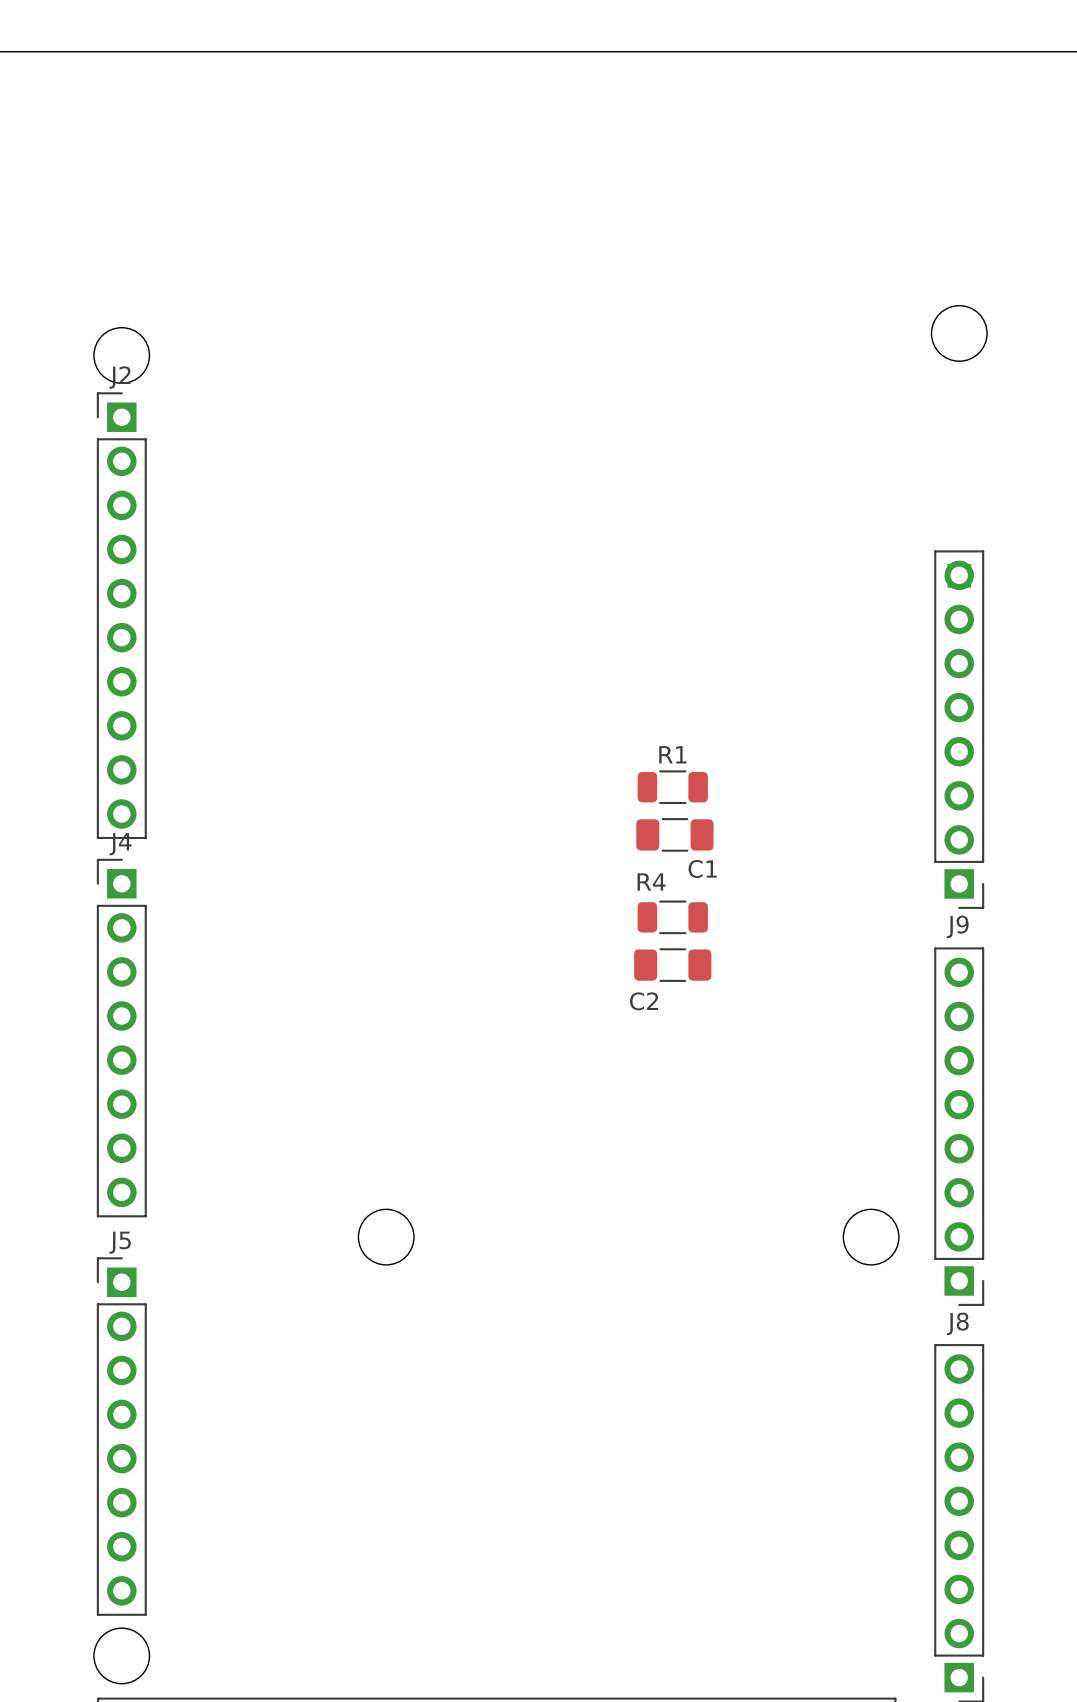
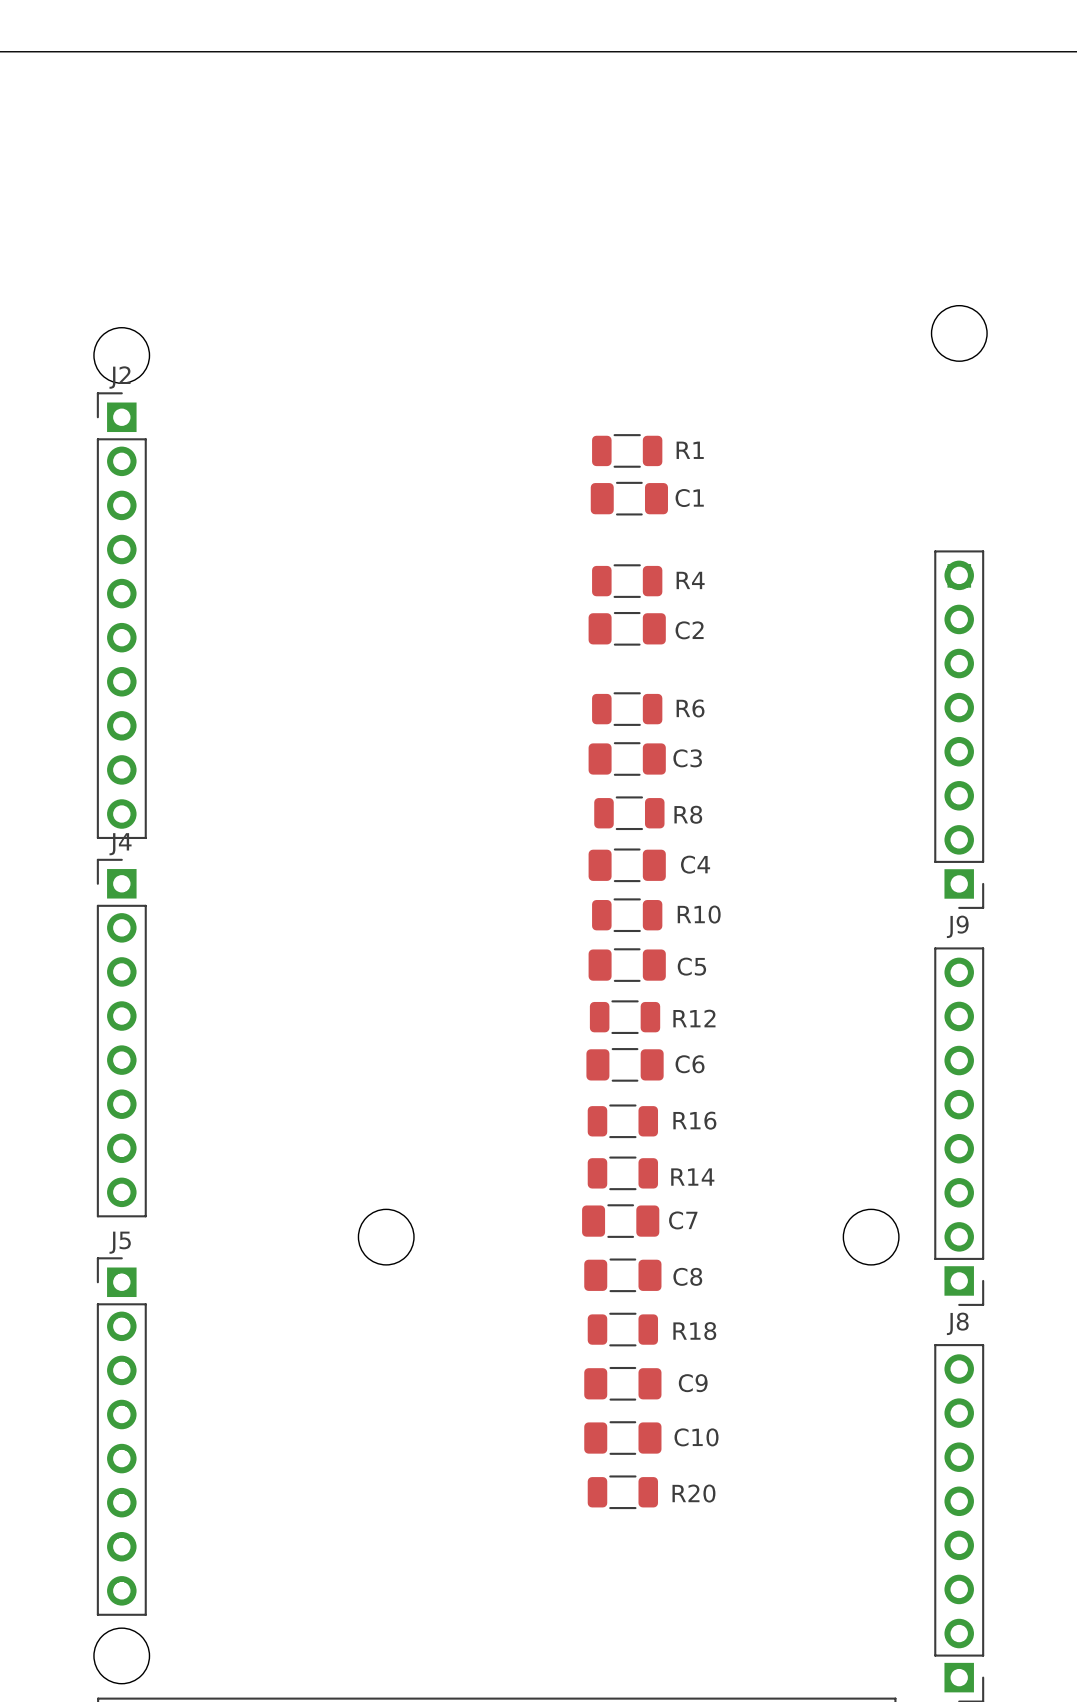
R6: none -> (627, 709)
R1 name position: R1 (672, 754) -> R1 (690, 450)
C3: none -> (627, 758)
R1 position: (672, 787) -> (627, 450)
R8: none -> (629, 813)
C1 position: (674, 834) -> (629, 498)
C4: none -> (627, 865)
C1 name position: C1 (702, 869) -> C1 (689, 498)
R4 name position: R4 (651, 882) -> R4 (690, 580)
R10: none -> (627, 915)
R4 position: (672, 917) -> (627, 581)
C5: none -> (627, 965)
C2 position: (672, 965) -> (627, 628)
C2 name position: C2 (644, 1001) -> C2 (689, 630)
R12: none -> (625, 1017)
C6: none -> (625, 1064)
R16: none -> (622, 1121)
R14: none -> (622, 1173)
C7: none -> (620, 1221)
C8: none -> (622, 1275)
R18: none -> (622, 1329)
C9: none -> (622, 1383)
C10: none -> (622, 1438)
R20: none -> (622, 1492)

